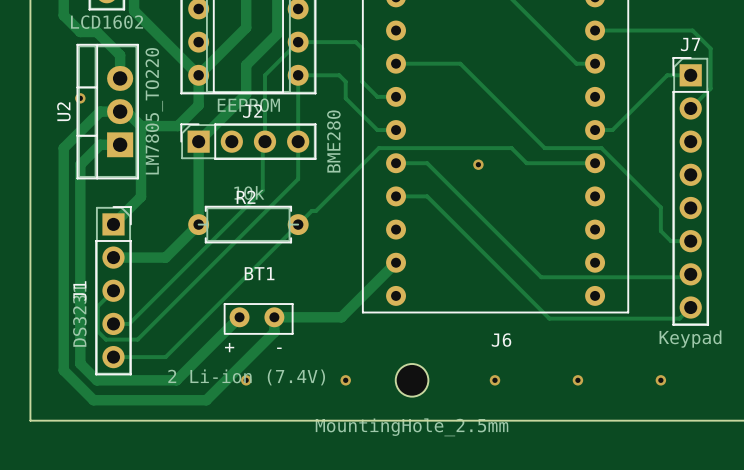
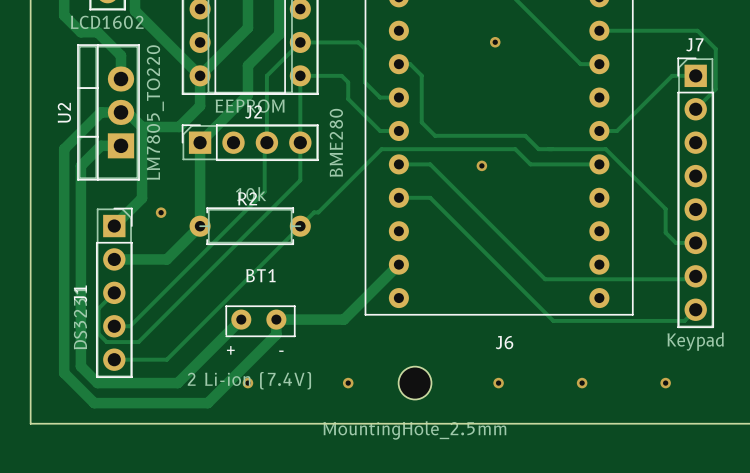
via: none -> (495, 42)
track: (407, 63) (460, 63) (544, 148) -> (410, 64) (421, 75) (421, 122) (435, 135) (525, 135) (538, 149) (548, 149)
via: (80, 98) -> none
via: none -> (161, 212)

